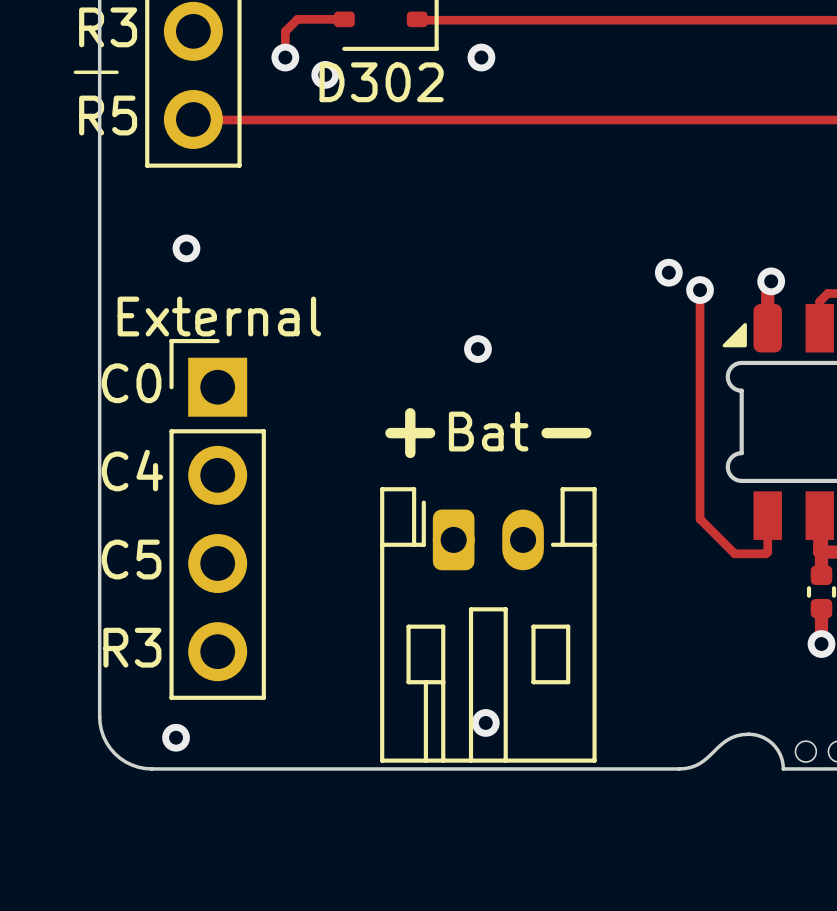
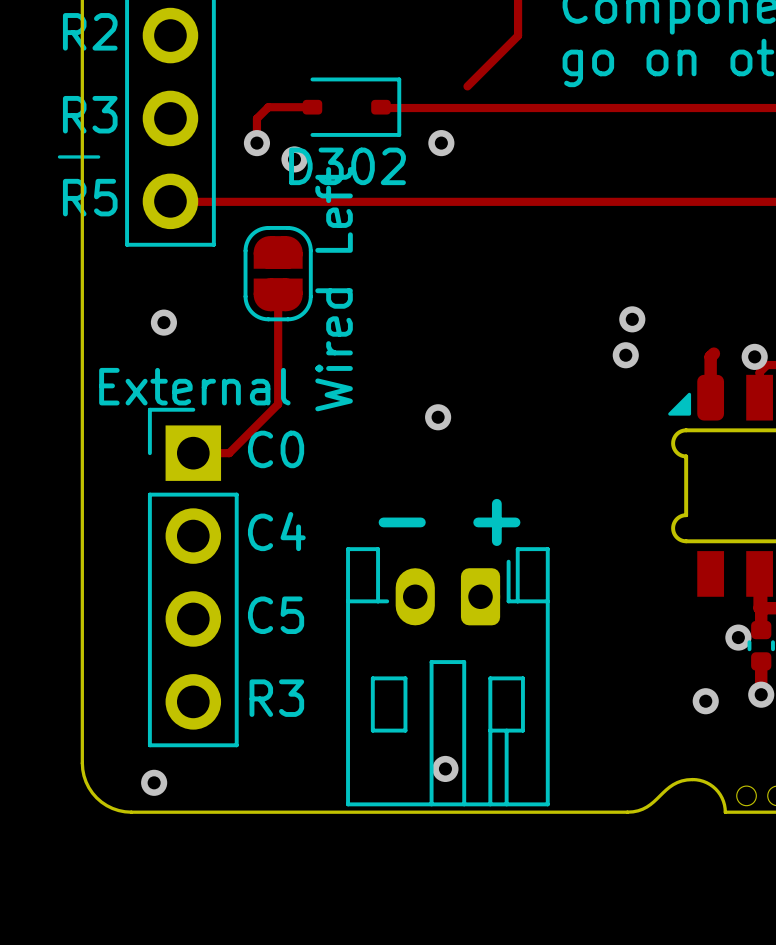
part: none -> Wired Left (278, 273)
track: none -> (278, 294) (278, 404) (229, 453) (193, 453)
via: none -> (632, 319)
via: (668, 272) -> none
via position: (771, 281) -> (754, 356)
via: none -> (625, 355)
track: (700, 290) (700, 519) (734, 553) (765, 553) (767, 552) (767, 515) -> none
via: (700, 290) -> none
part side: top (217, 519) -> bottom (193, 577)
via: none -> (738, 637)
part side: top (488, 624) -> bottom (447, 676)
via: none -> (705, 701)

